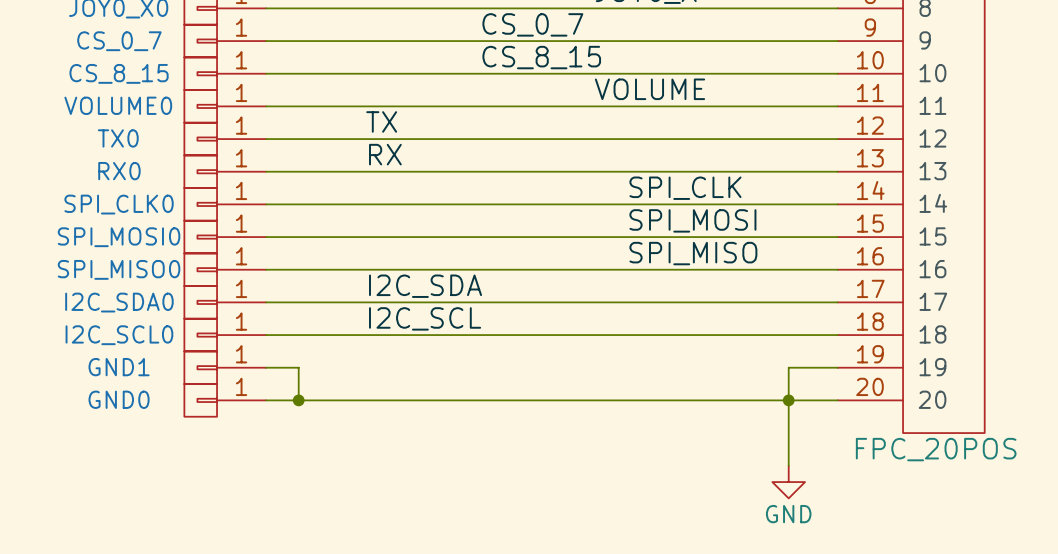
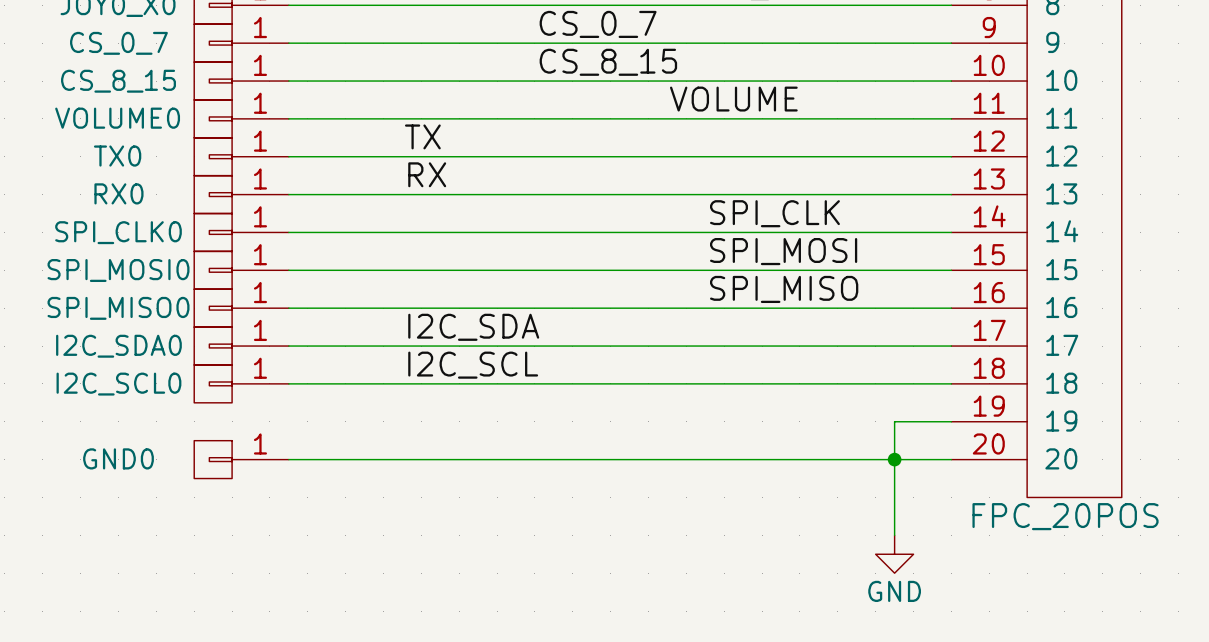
GND1: (225, 367) -> none
wire: (266, 367) (298, 367) (298, 400) -> none
junction: (298, 400) -> none

